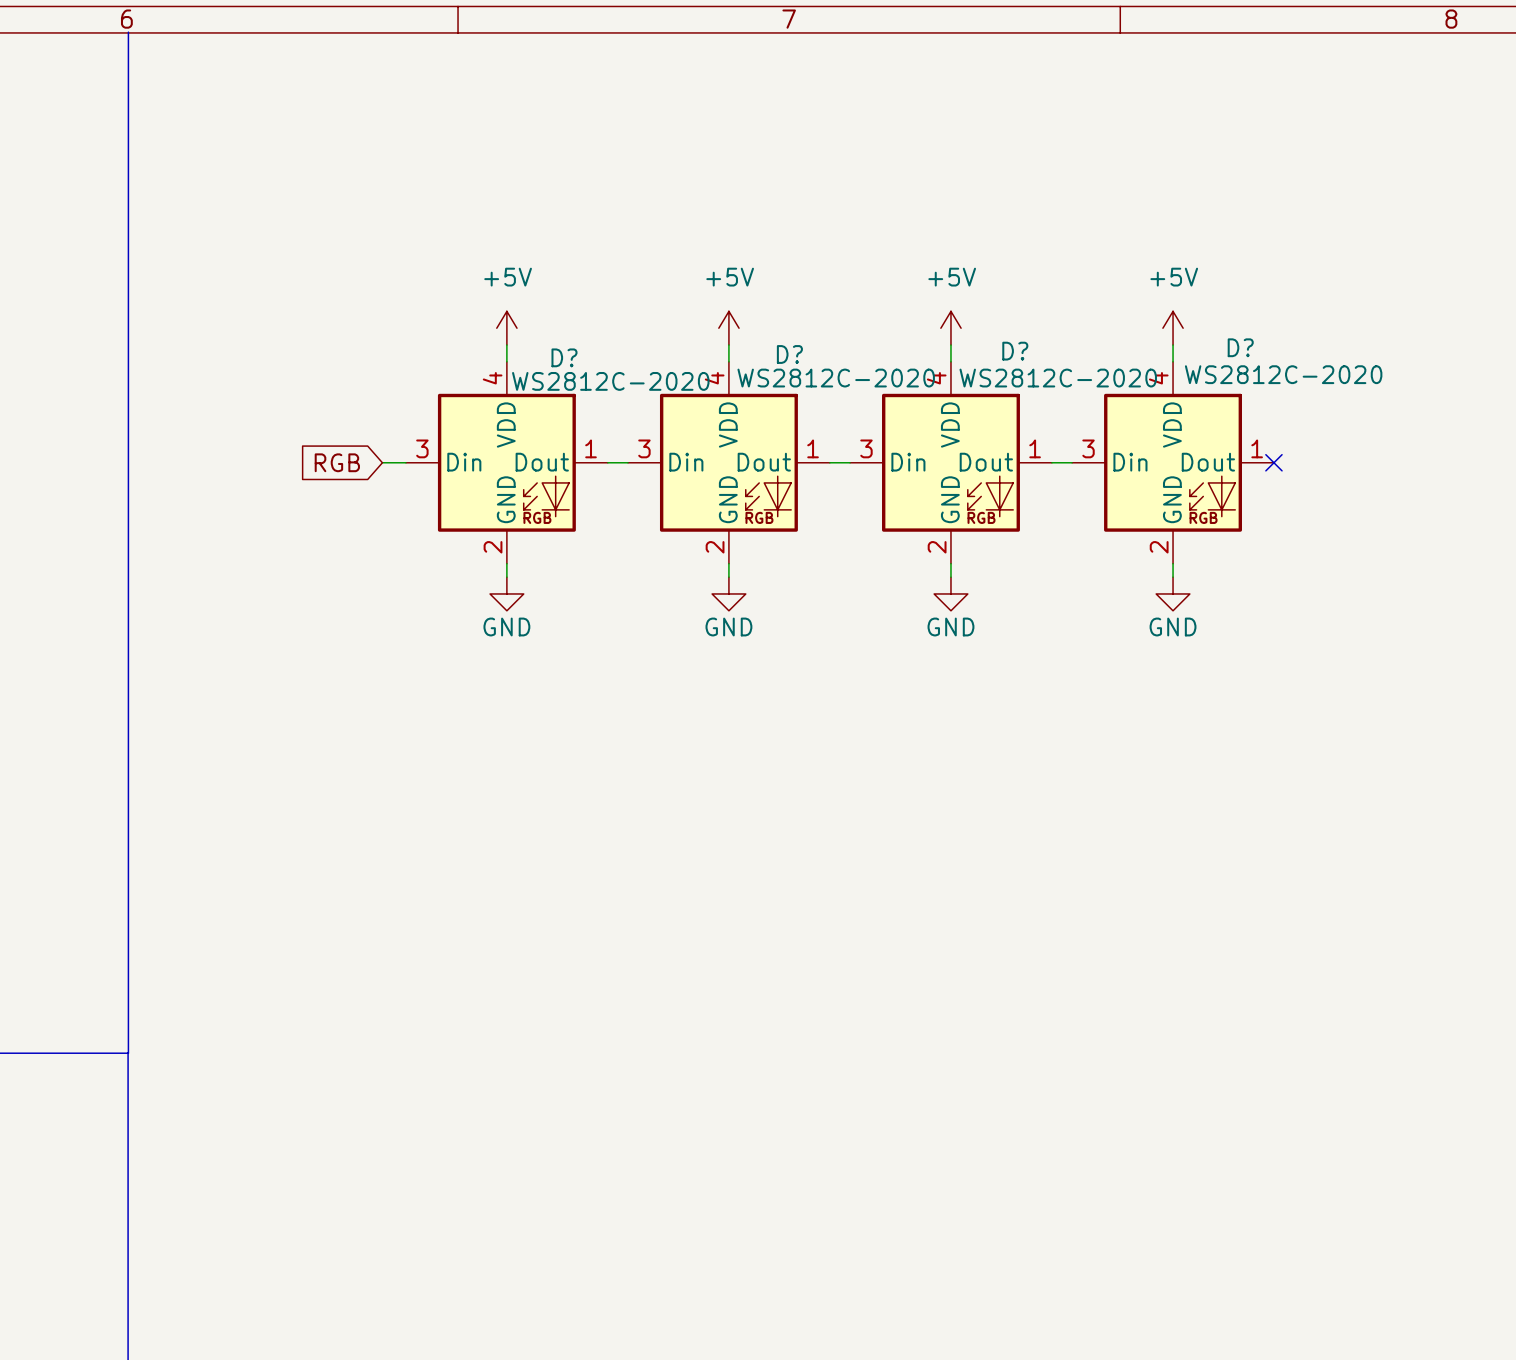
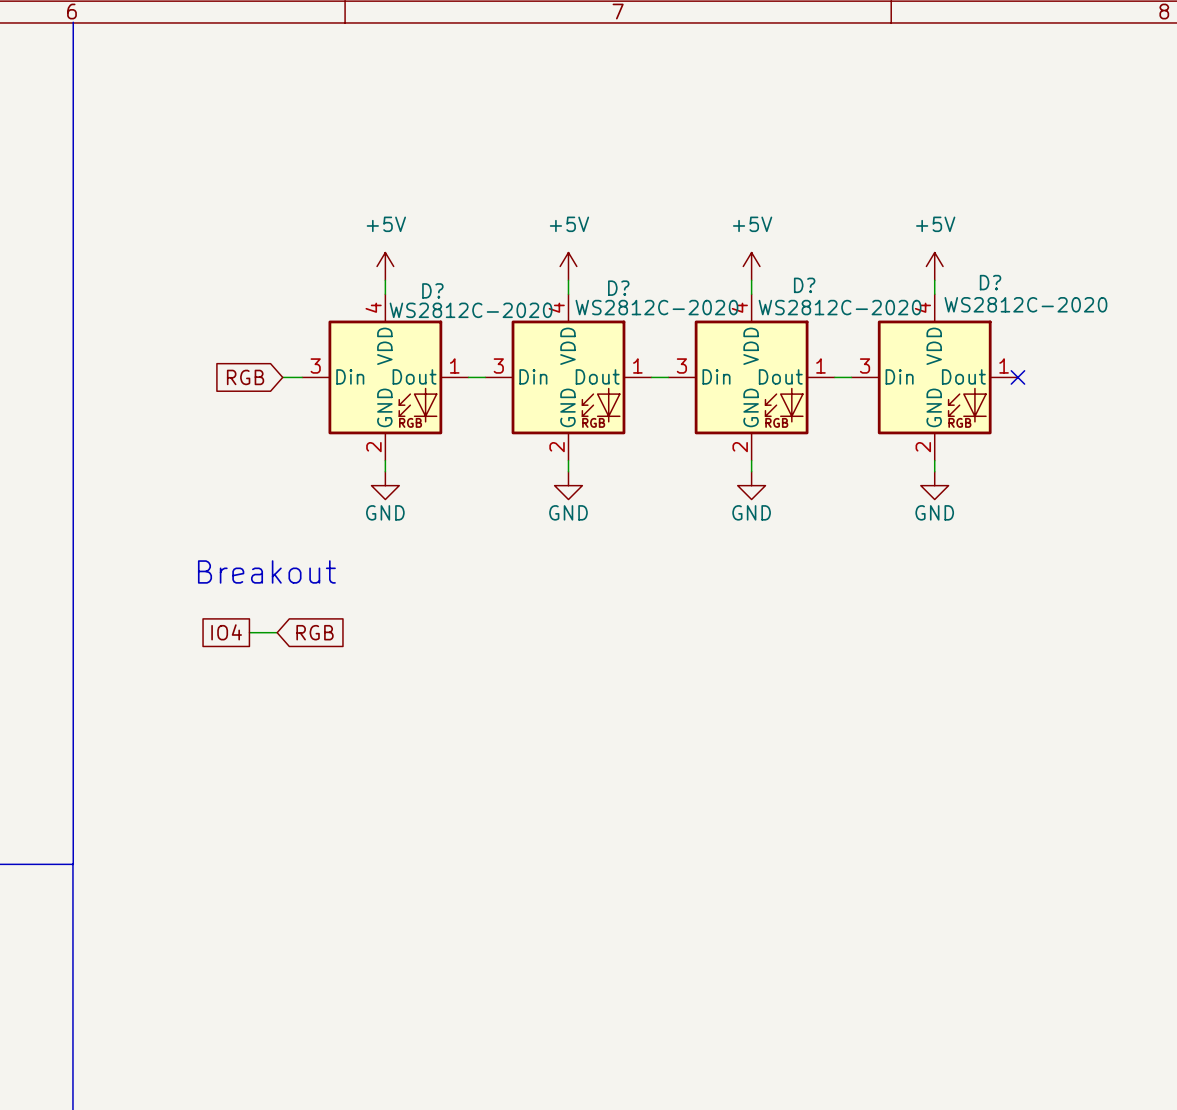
text: none -> Breakout (266, 571)
global label: none -> IO4 (226, 632)
wire: none -> (249, 632) (277, 632)
global label: none -> RGB (315, 632)

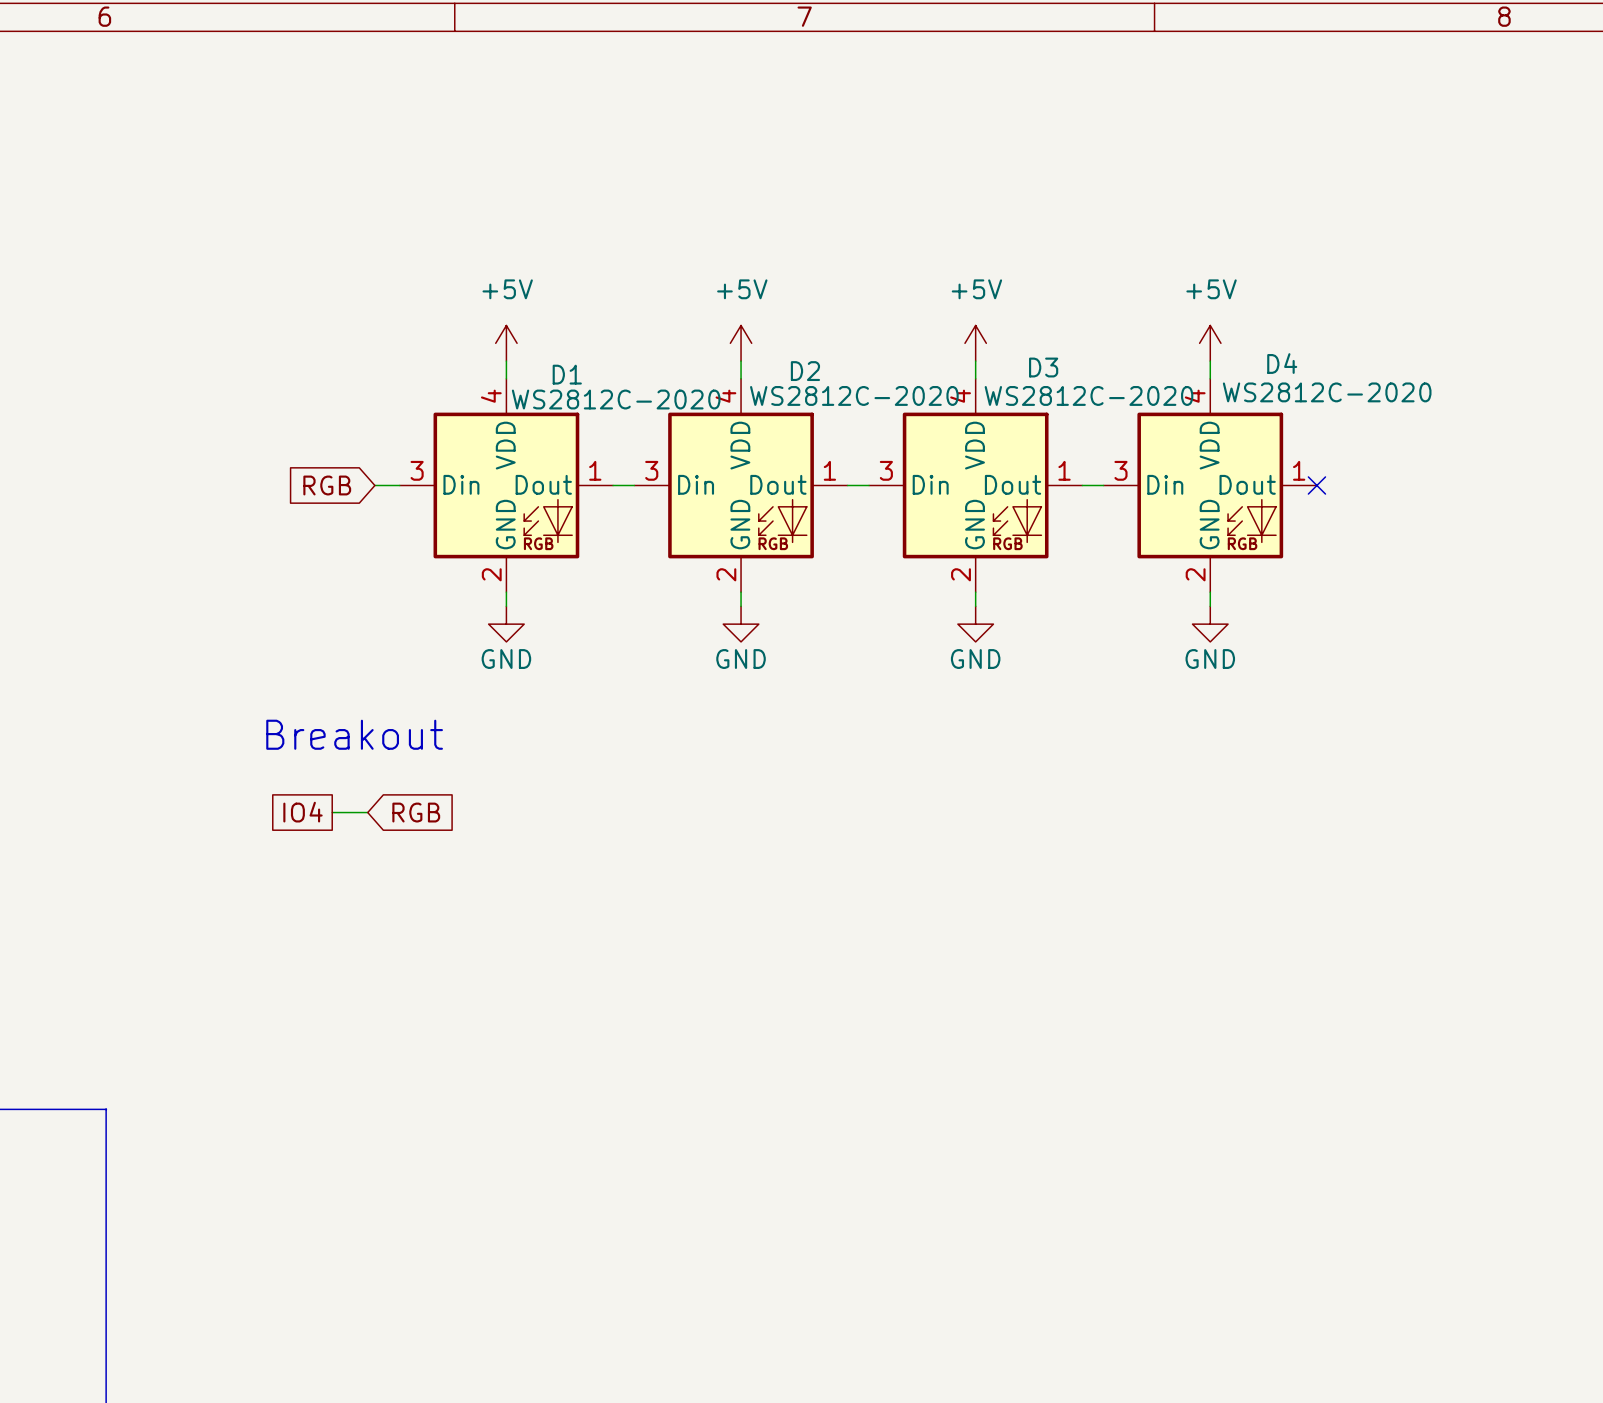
line: (73, 22) (73, 864) -> none
D? name: D? (990, 282) -> D4 (1282, 363)
D? name: D? (804, 285) -> D3 (1043, 367)
D? name: D? (618, 288) -> D2 (805, 371)
D? name: D? (432, 290) -> D1 (567, 374)

